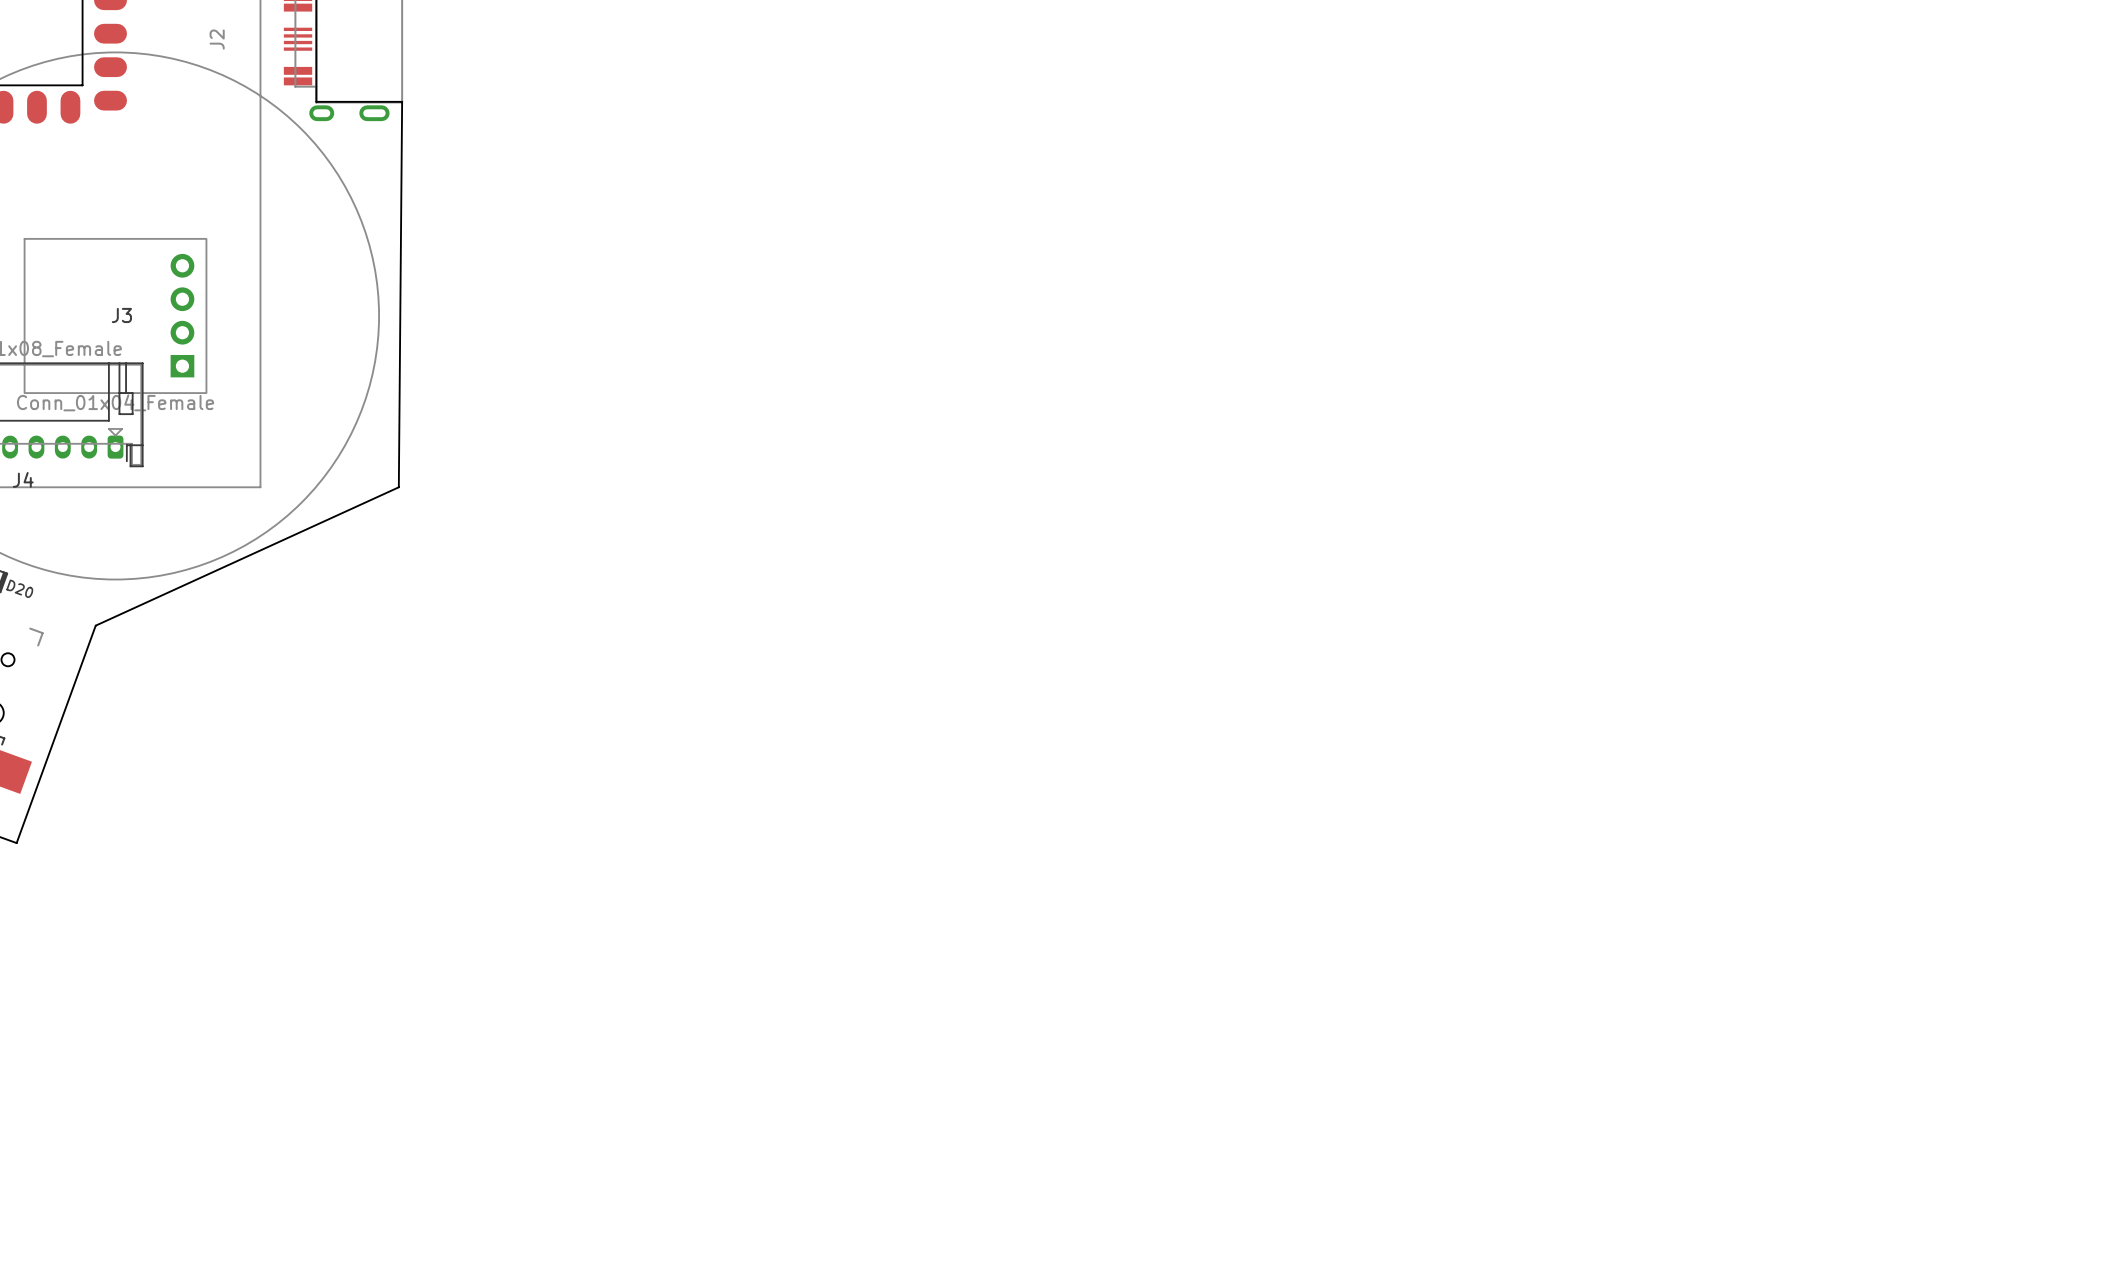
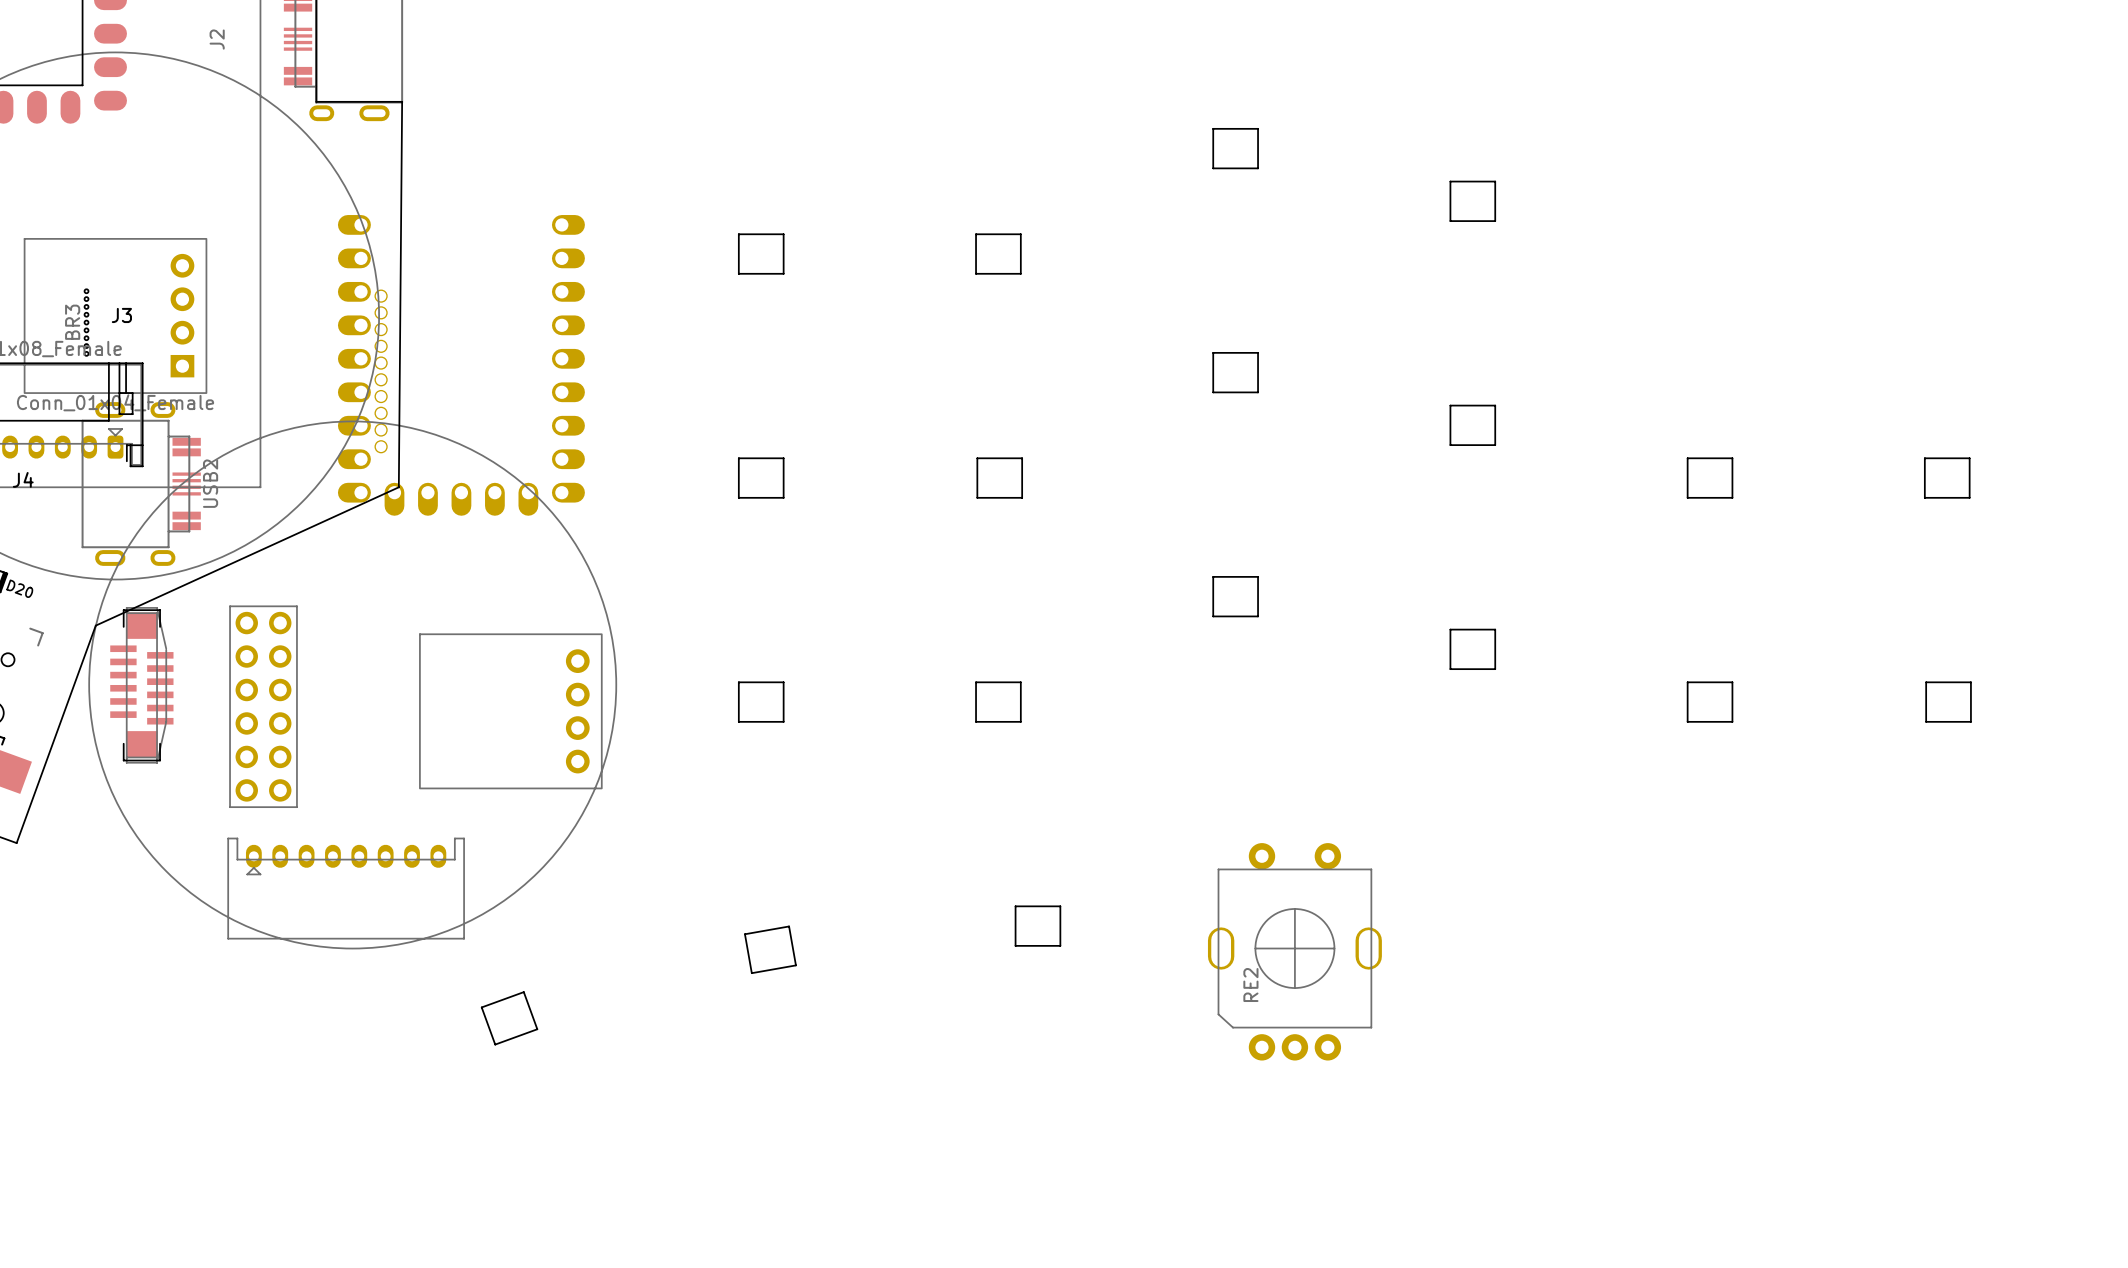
part: none -> (1235, 148)
part: none -> (1472, 201)
part: none -> (761, 254)
part: none -> (998, 254)
BR3: none -> (86, 322)
part: none -> (461, 365)
part: none -> (1235, 372)
drawing: none -> [88, 420, 617, 950]
part: none -> (1472, 425)
part: none -> (761, 478)
part: none -> (999, 478)
part: none -> (1710, 478)
part: none -> (1947, 478)
USB2: none -> (141, 483)
part: none -> (1235, 596)
part: none -> (1472, 649)
part: none -> (141, 685)
part: none -> (761, 702)
part: none -> (998, 702)
part: none -> (1710, 702)
part: none -> (1948, 702)
part: none -> (263, 706)
part: none -> (510, 711)
part: none -> (346, 888)
part: none -> (1037, 926)
part: none -> (770, 949)
RE2: none -> (1294, 951)
part: none -> (509, 1018)

